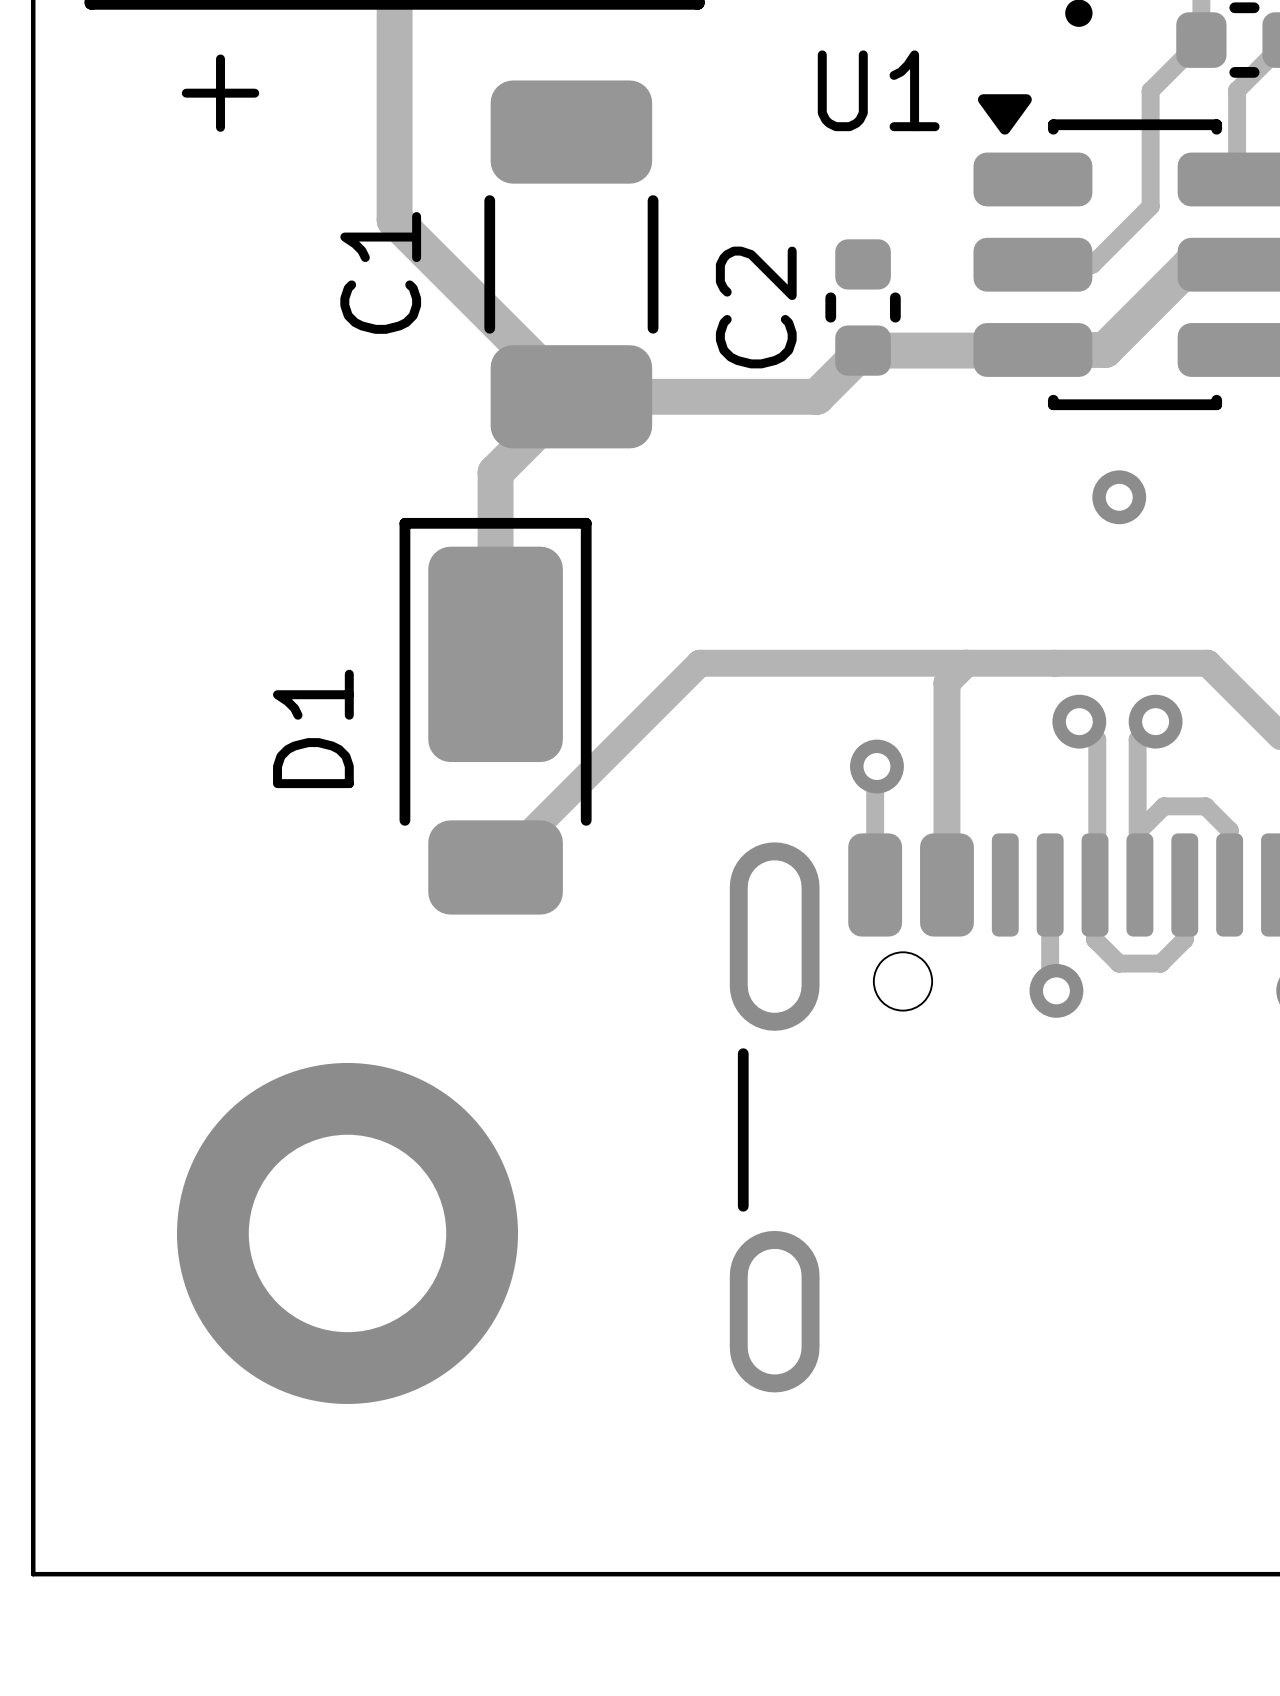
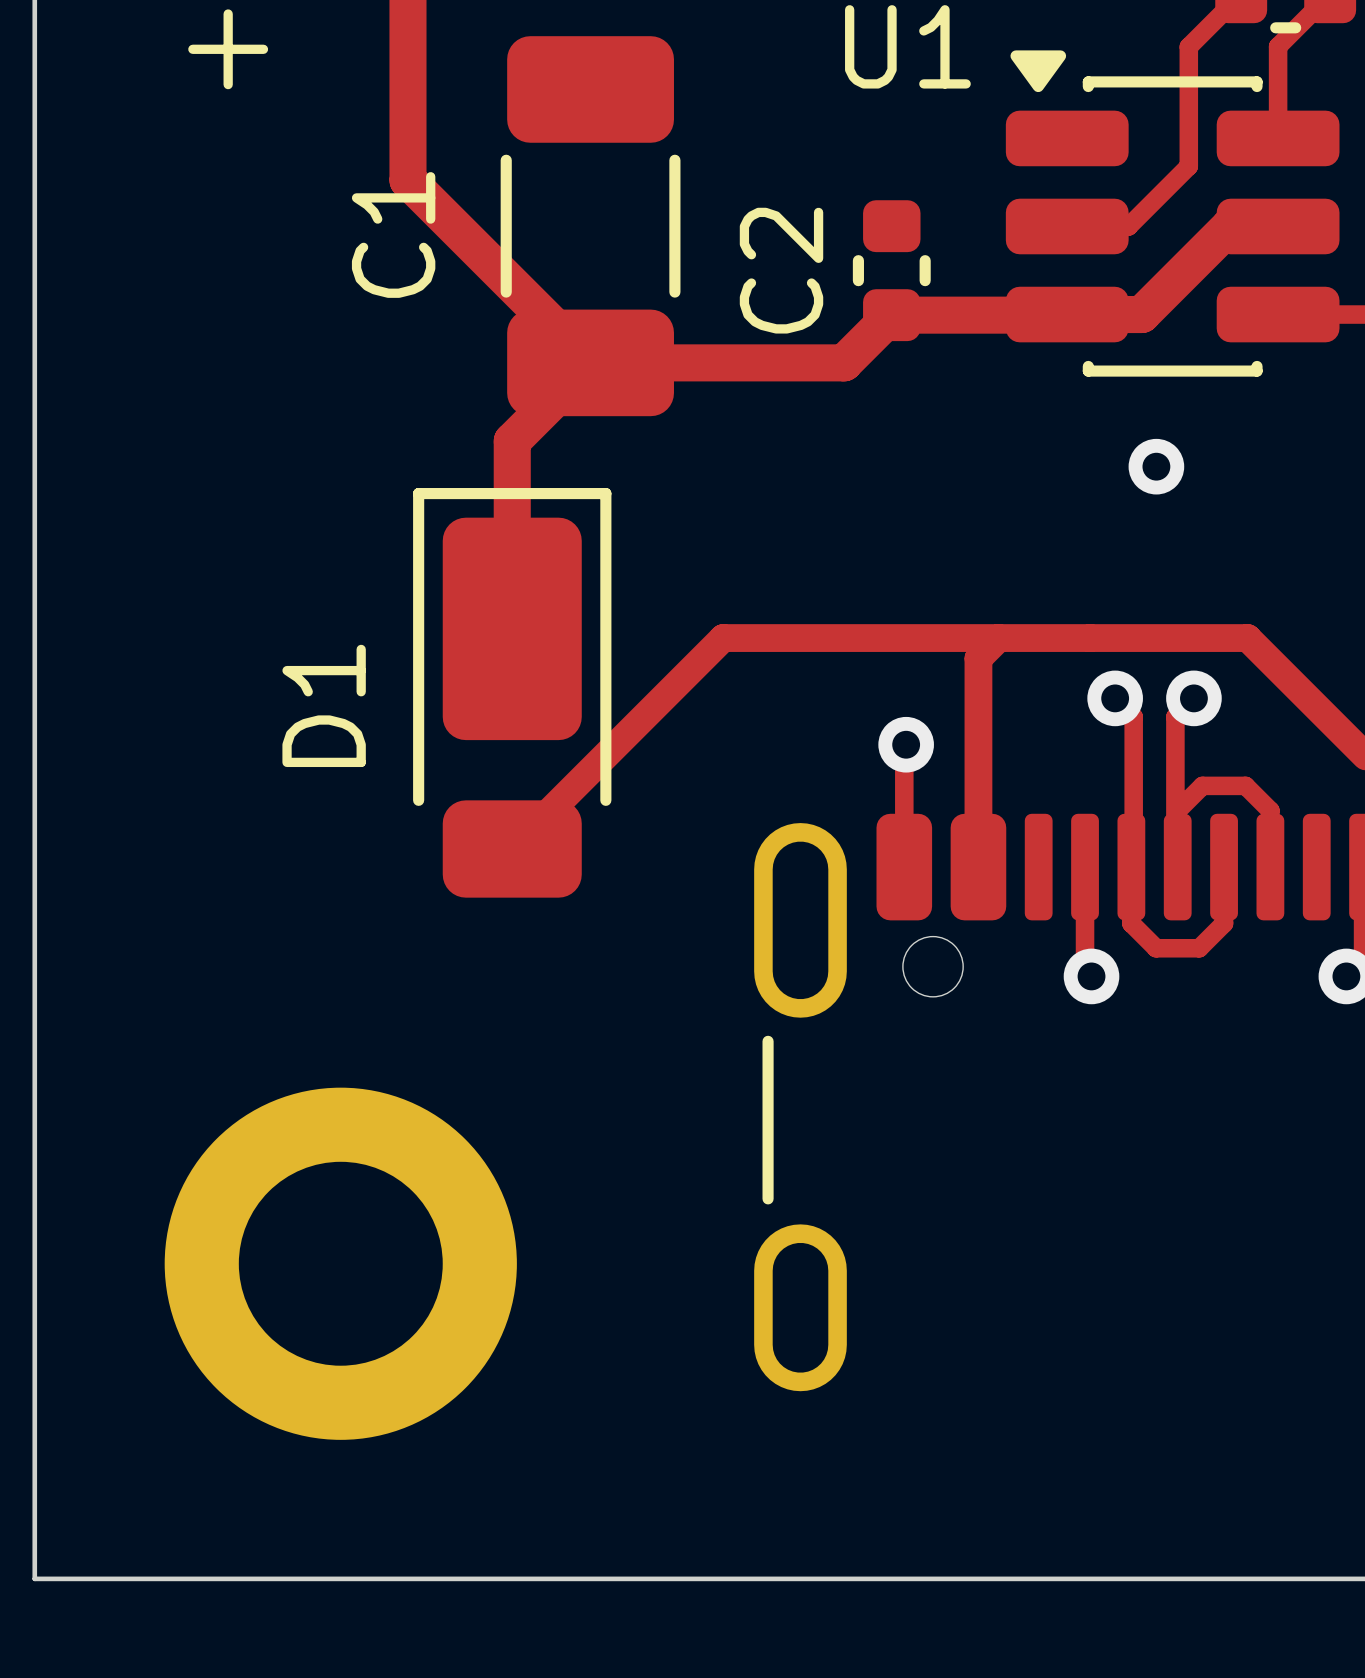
part position: (347, 1233) -> (340, 1263)

